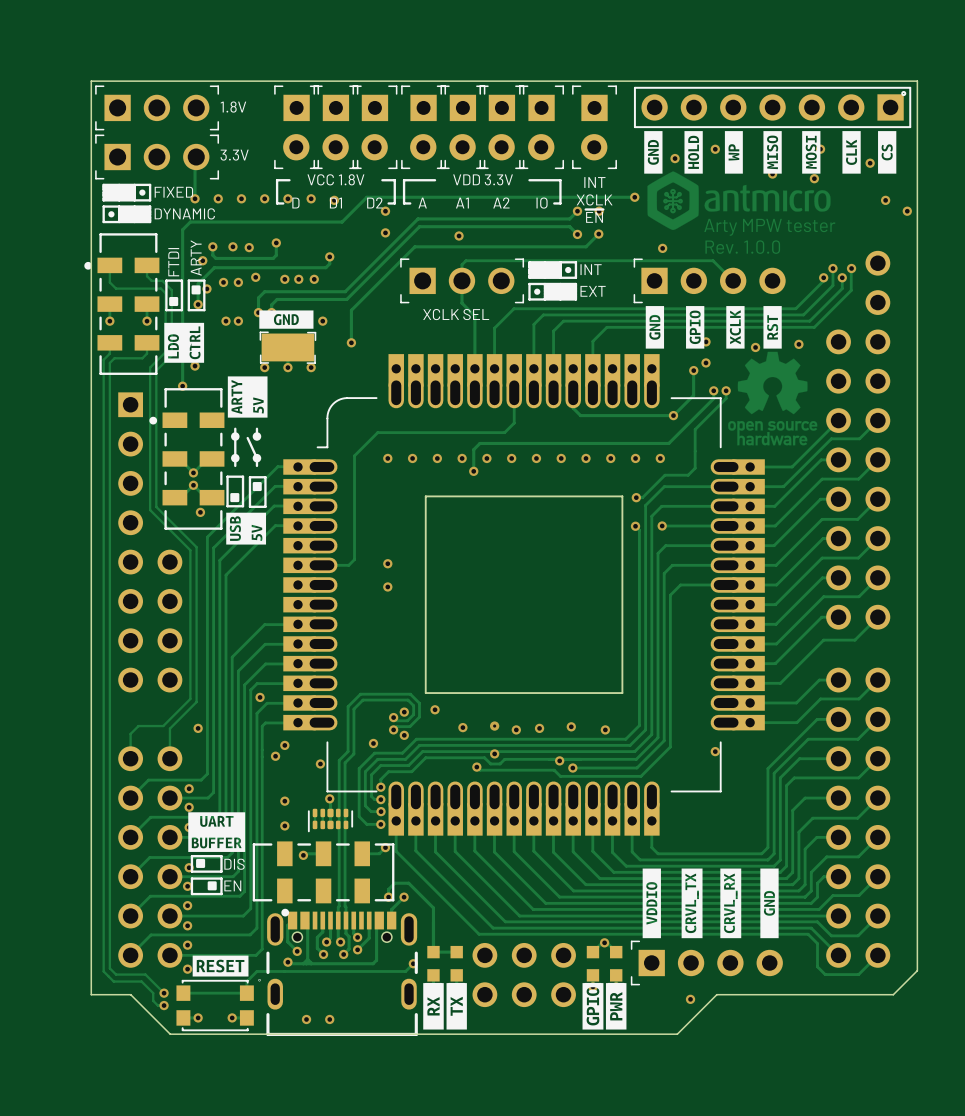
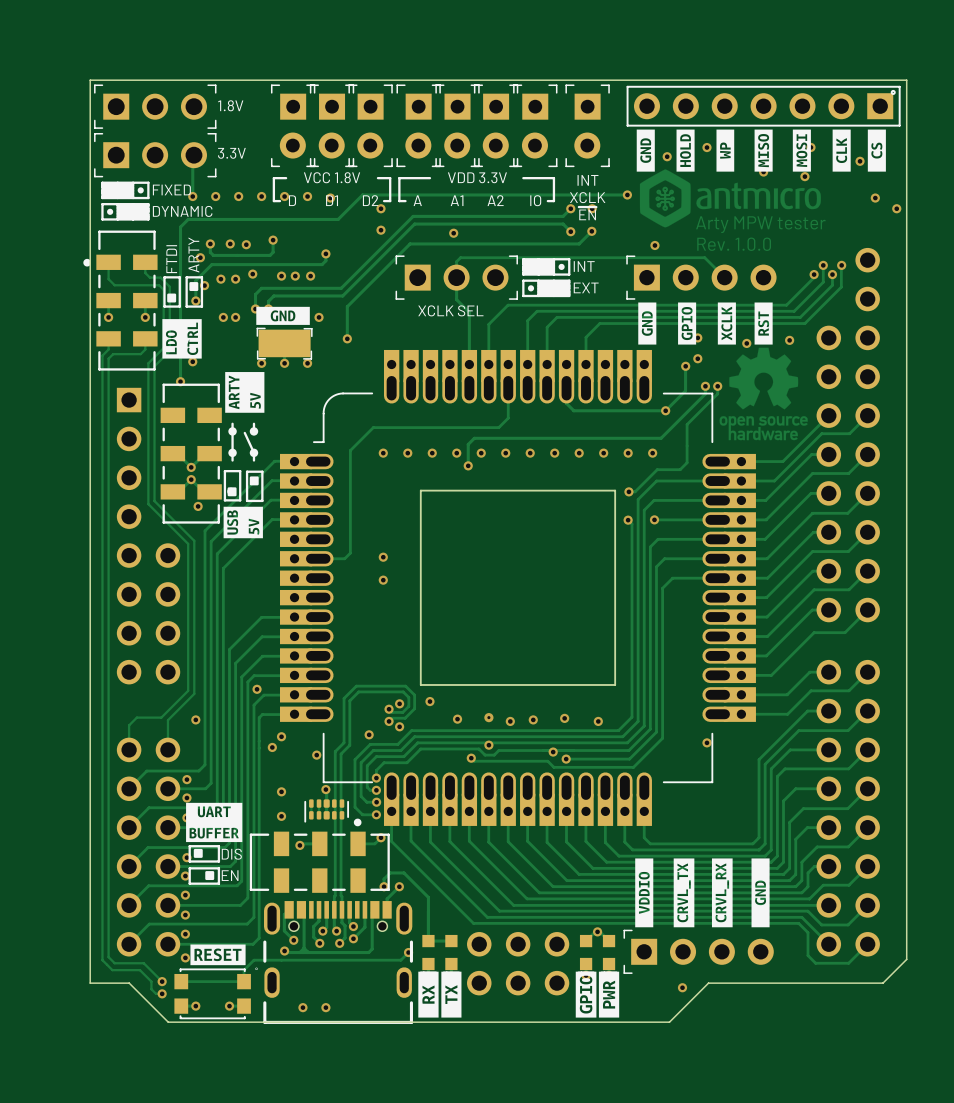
part rotation: 0° (186, 458) -> 180° (197, 453)
part rotation: 0° (323, 878) -> 180° (319, 855)

